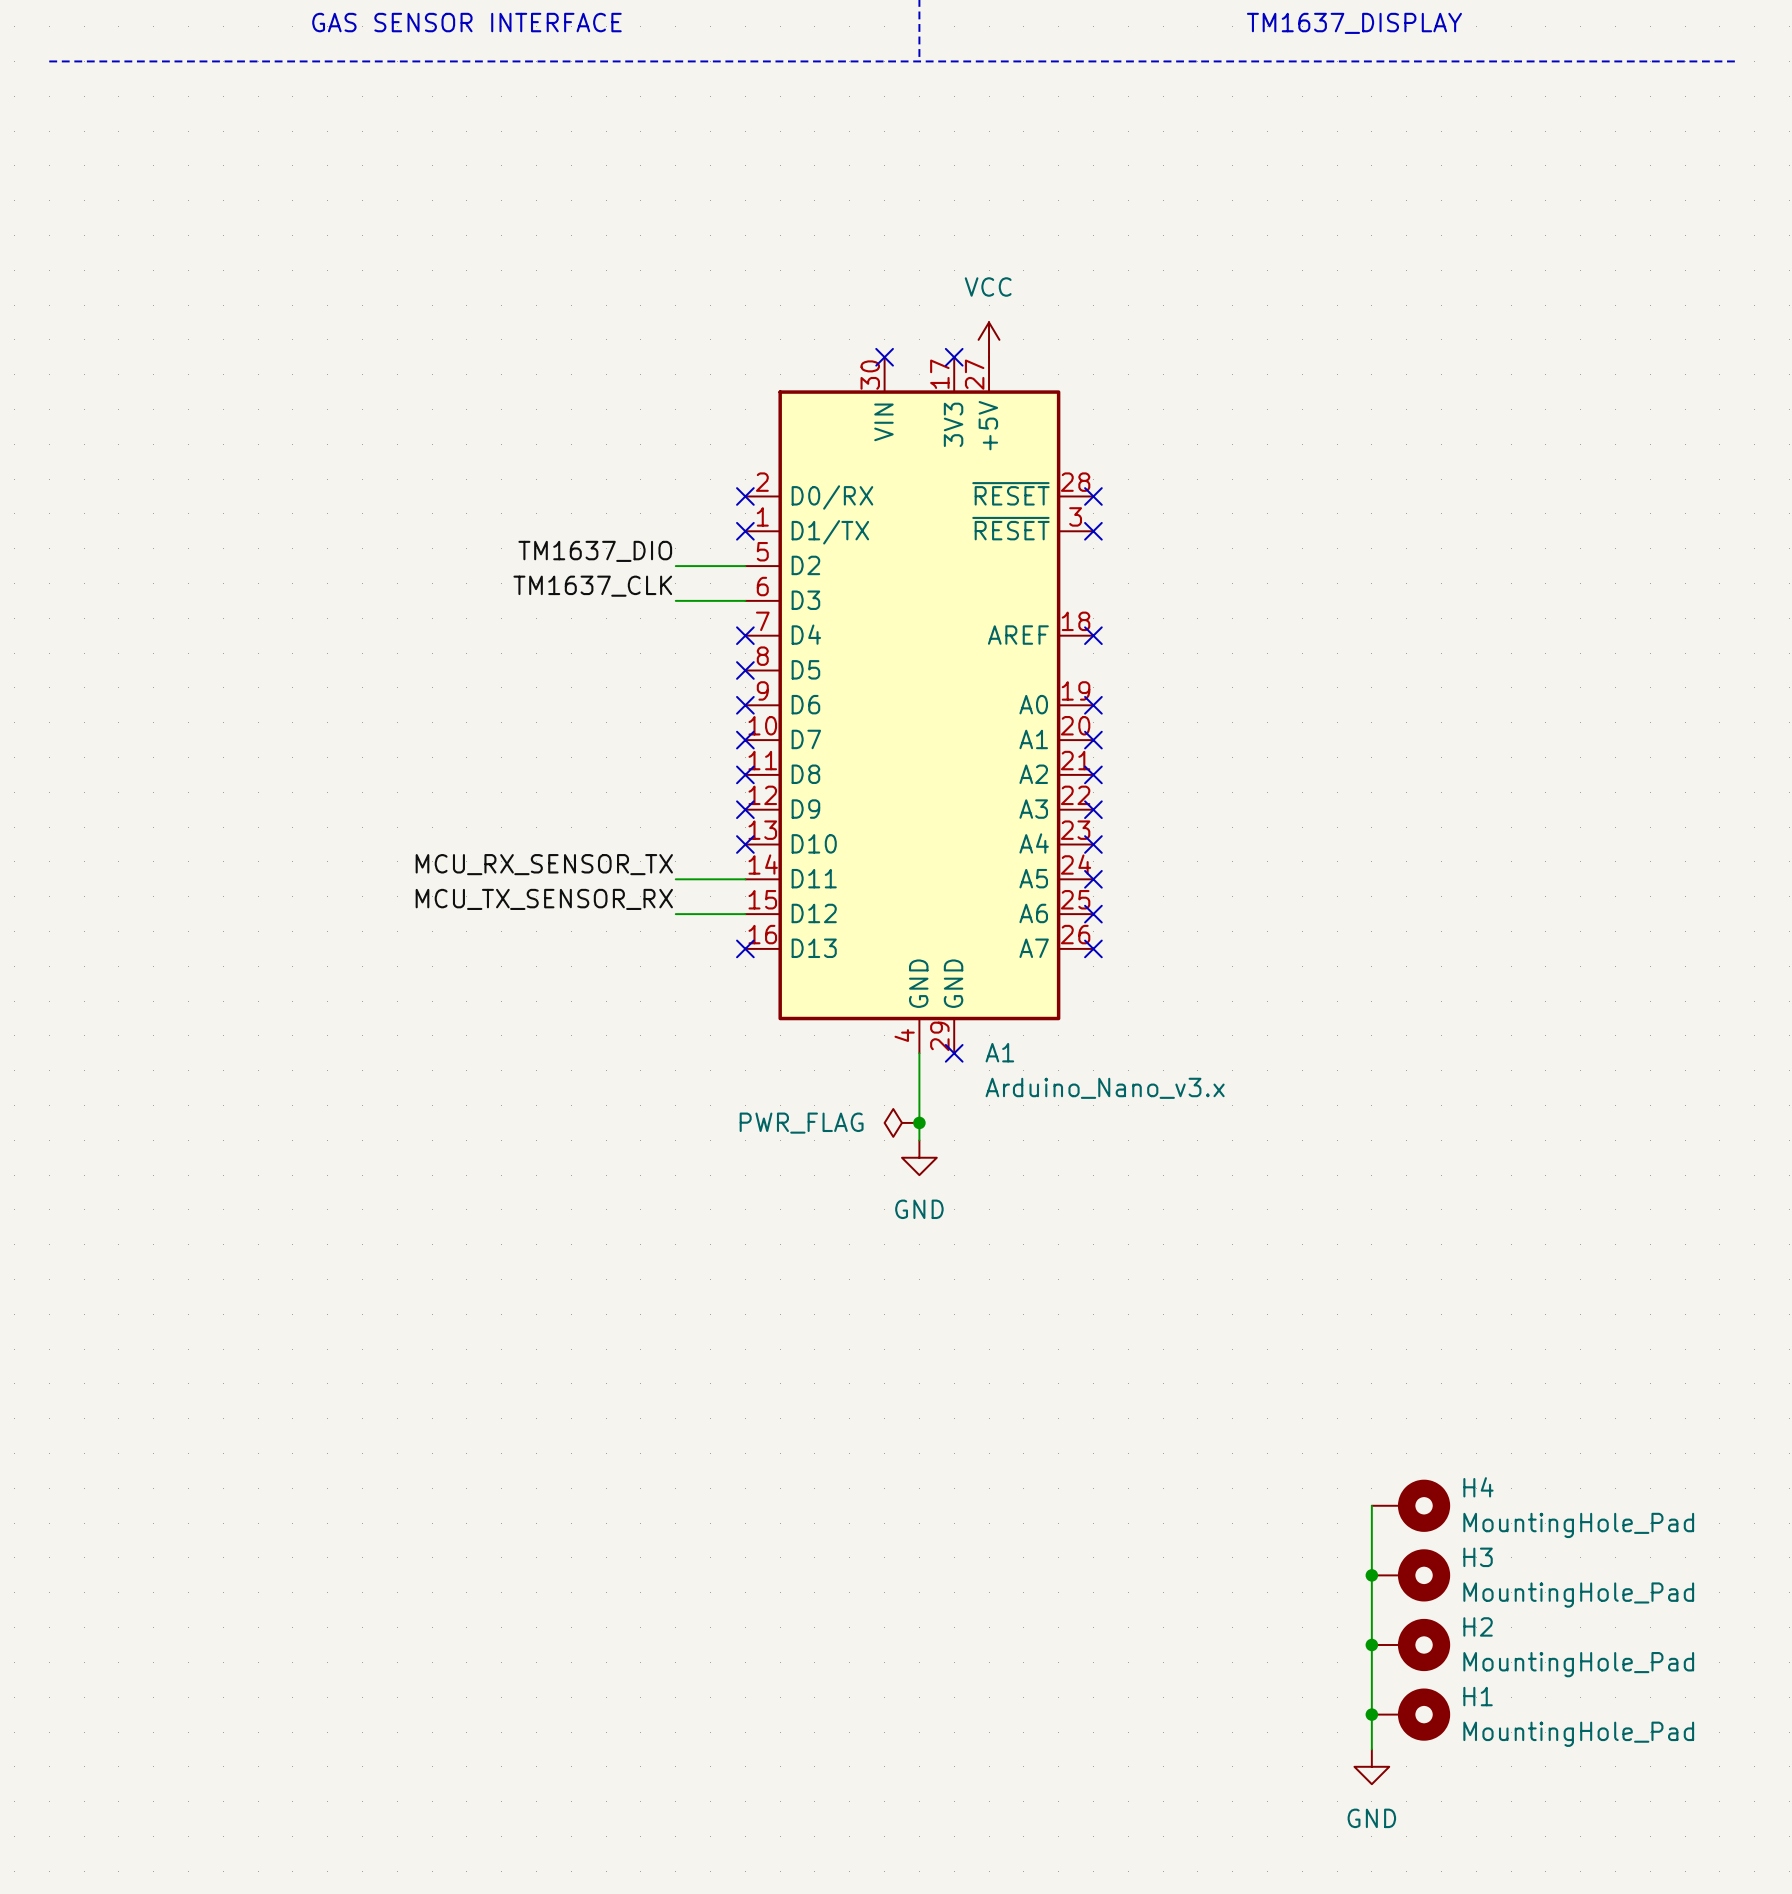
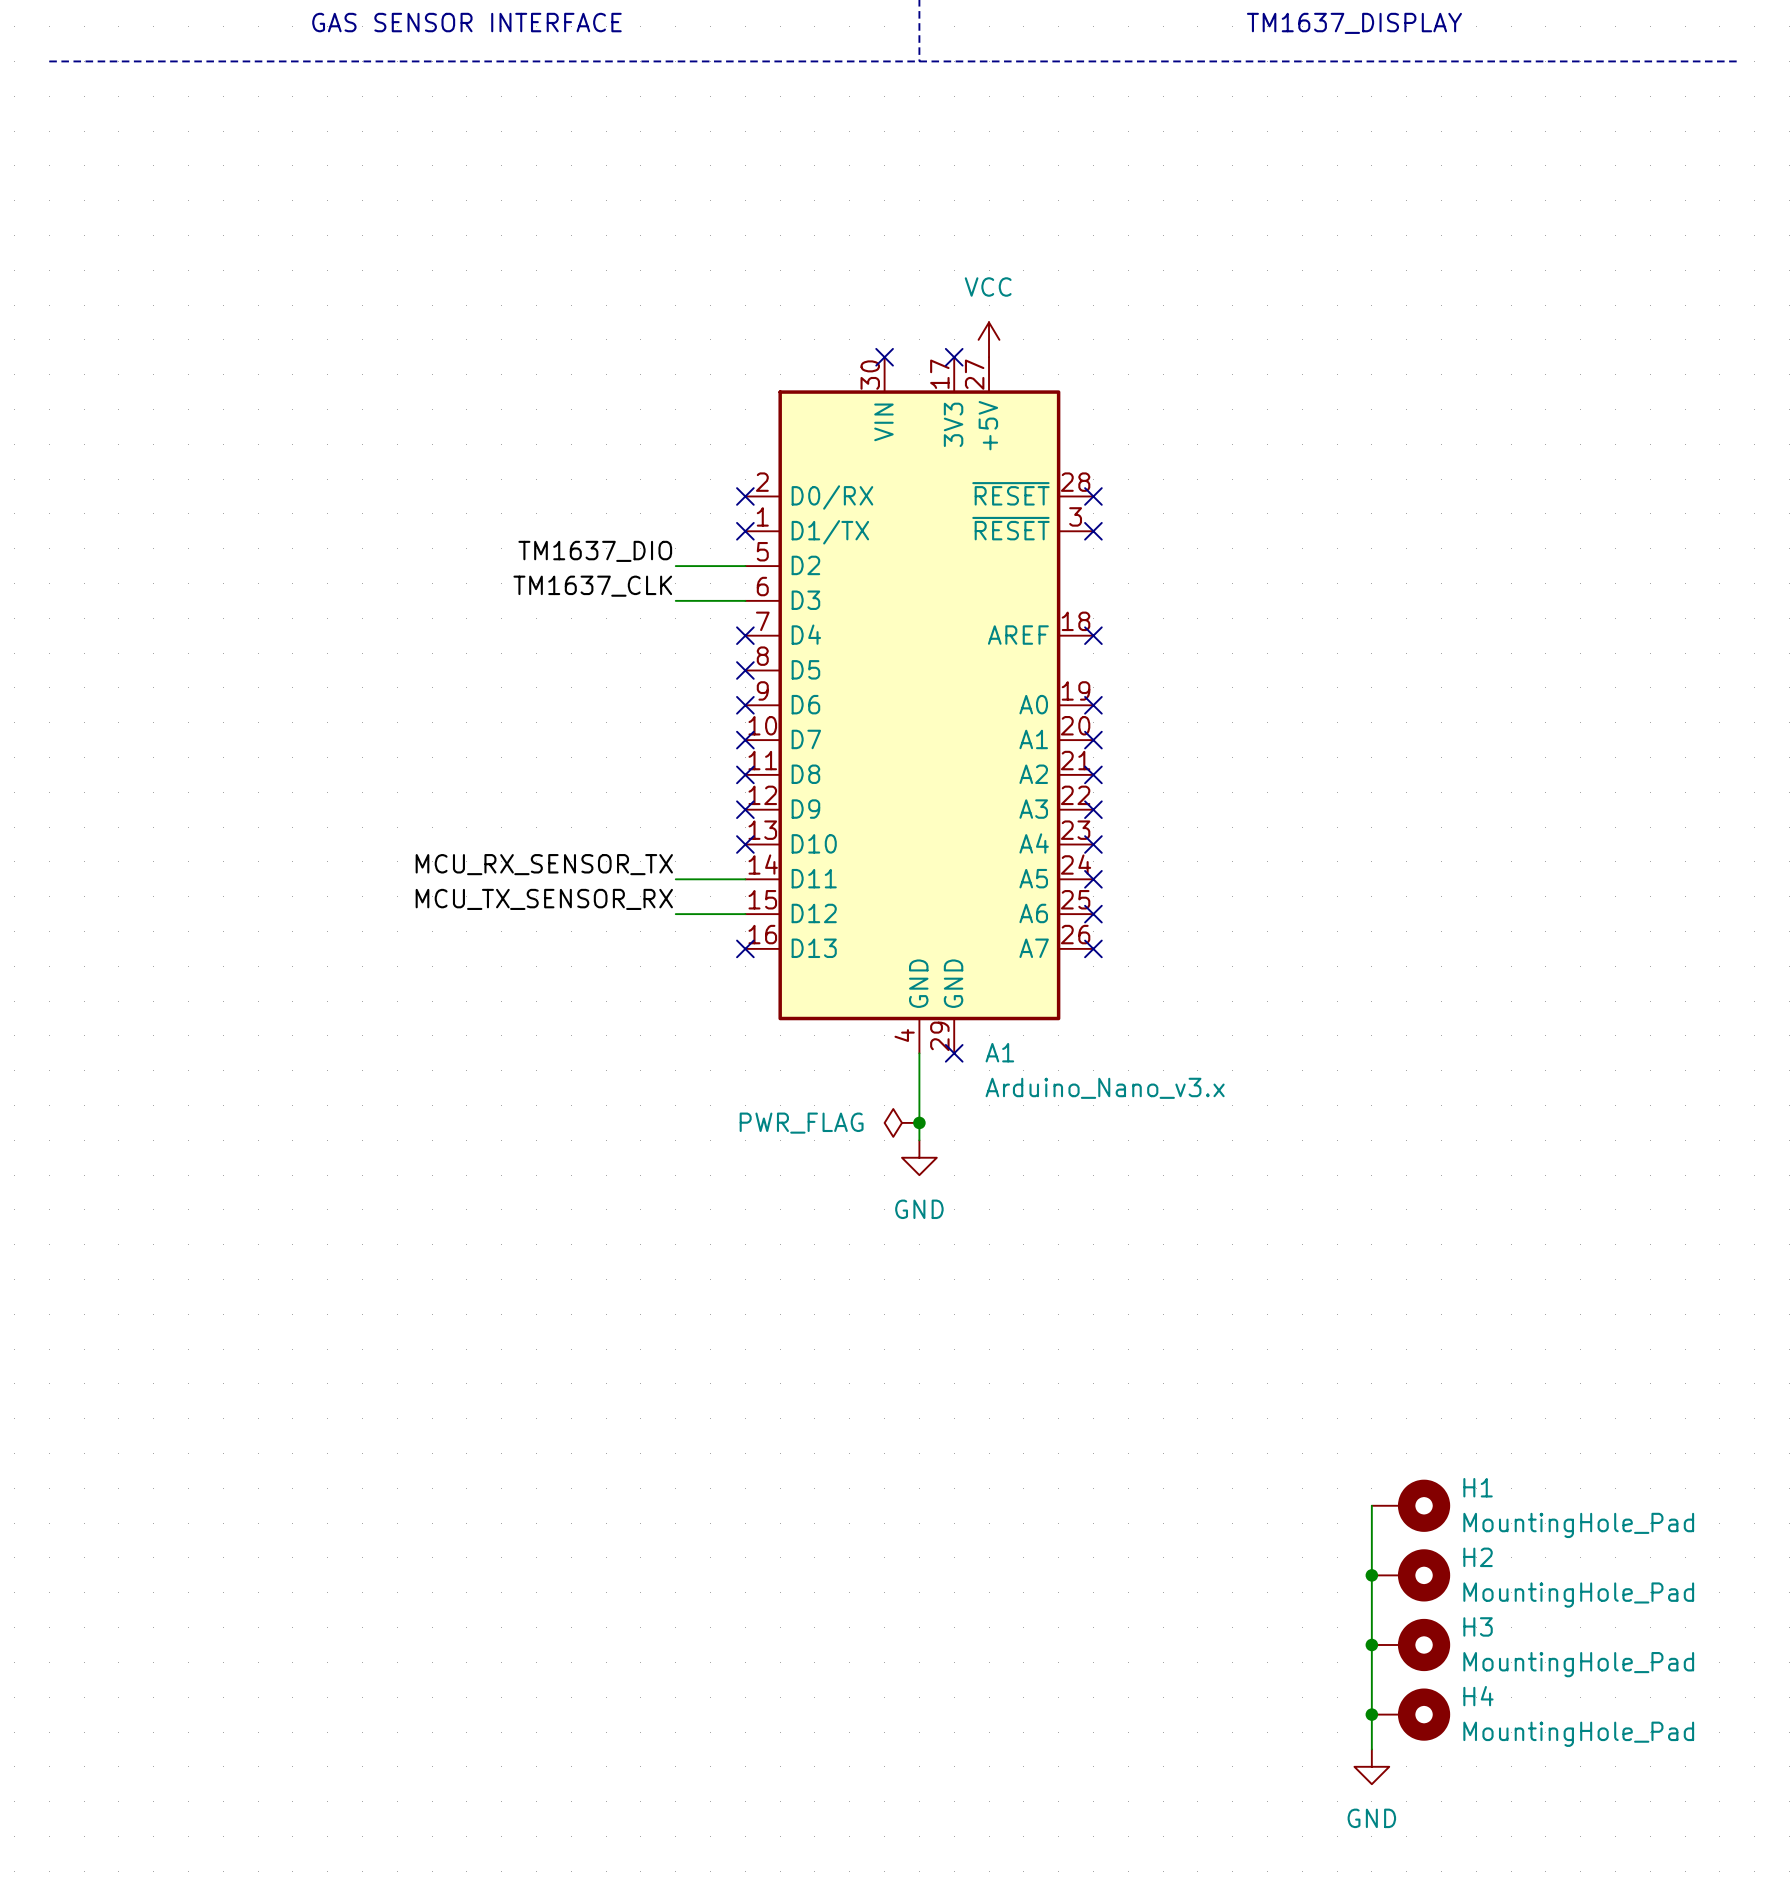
H4 name: H4 (1478, 1487) -> H1 (1478, 1487)
H3 name: H3 (1478, 1557) -> H2 (1478, 1557)
H2 name: H2 (1478, 1626) -> H3 (1478, 1626)
H1 name: H1 (1478, 1696) -> H4 (1478, 1696)

